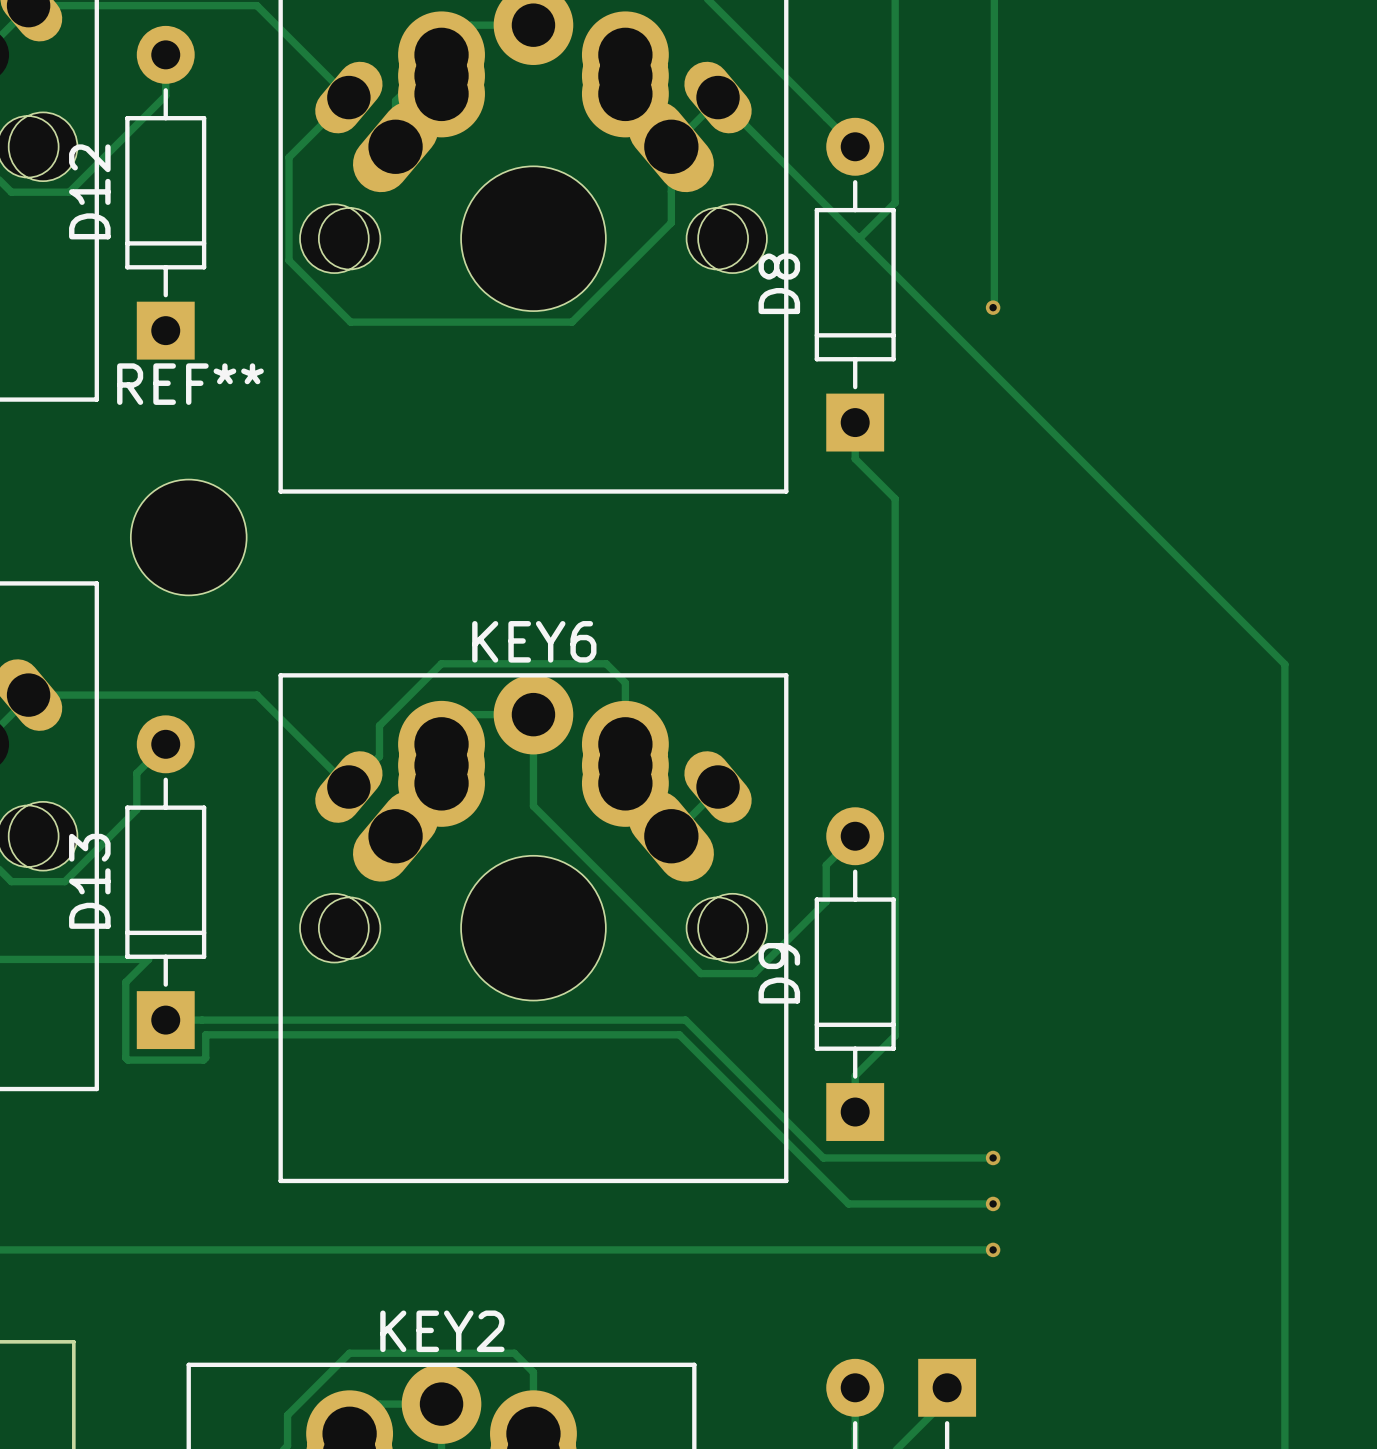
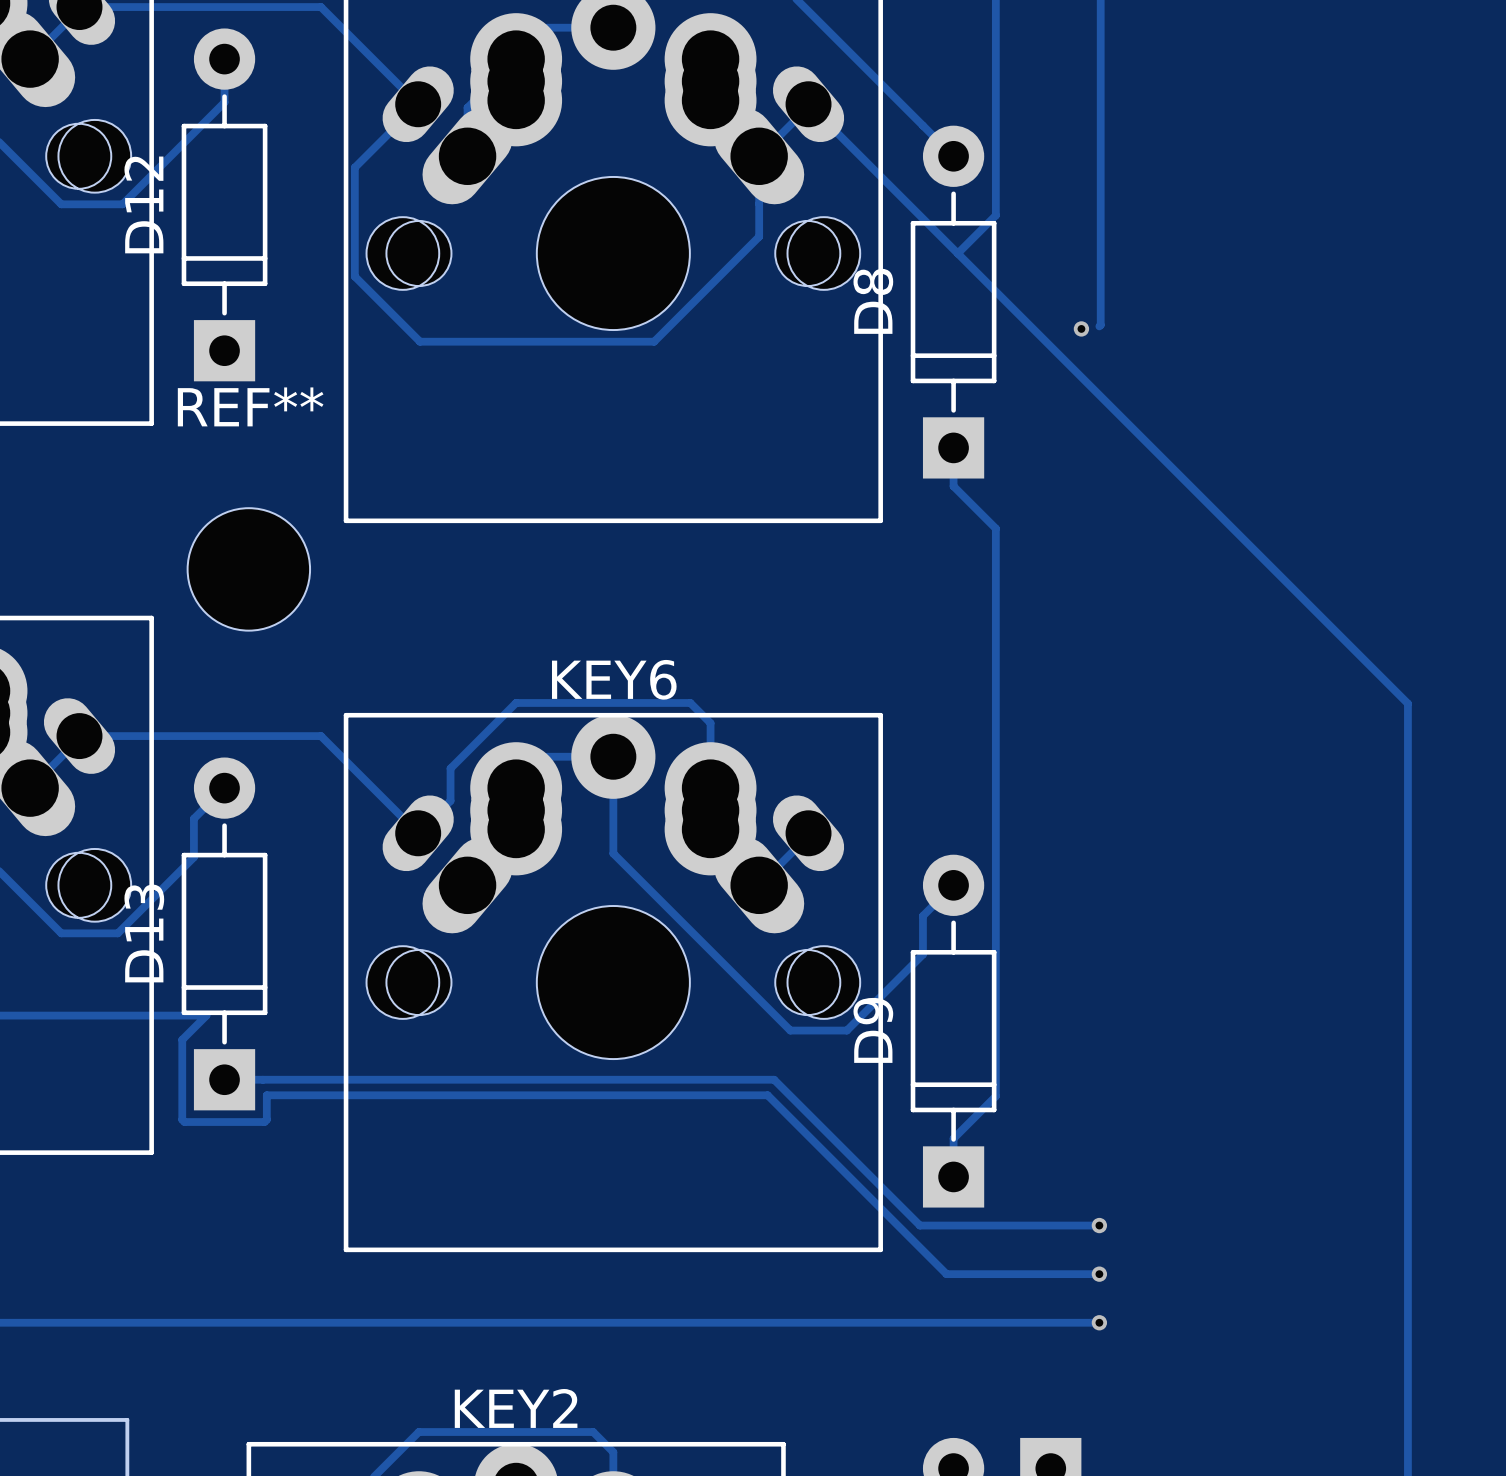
via position: (993, 307) -> (1081, 328)

